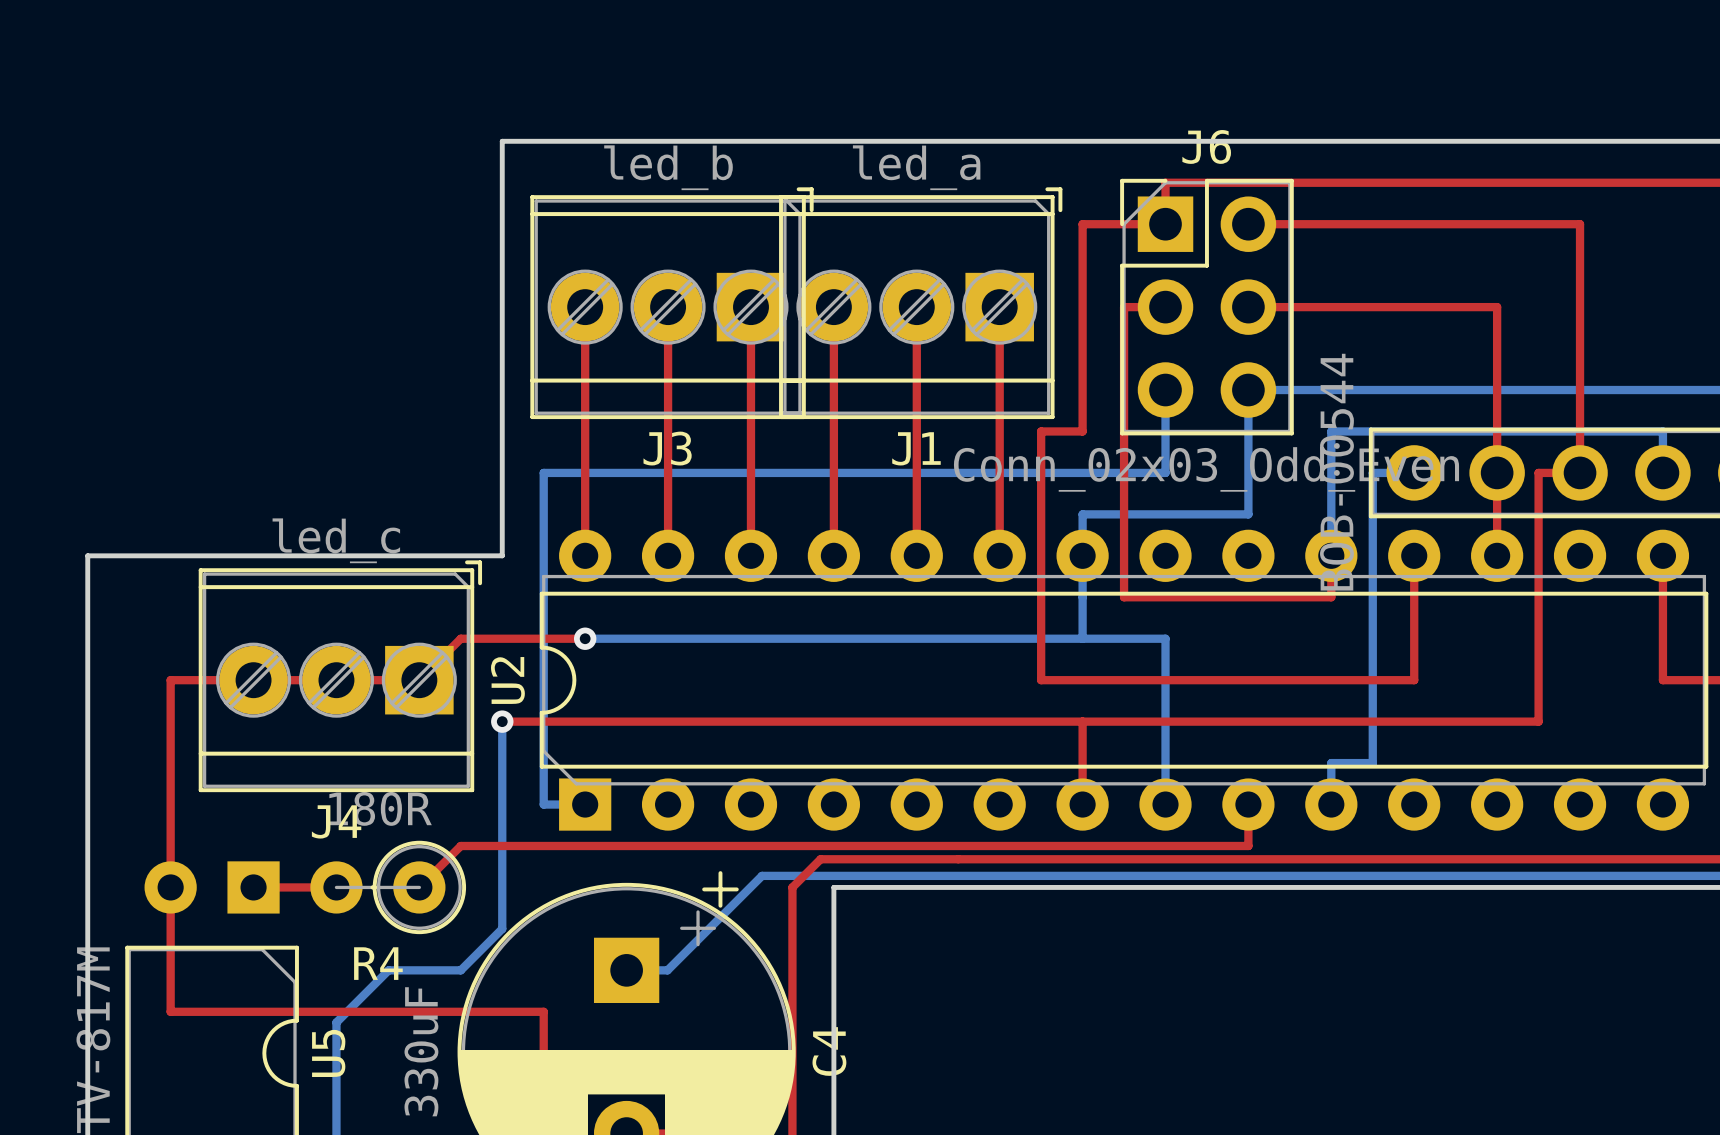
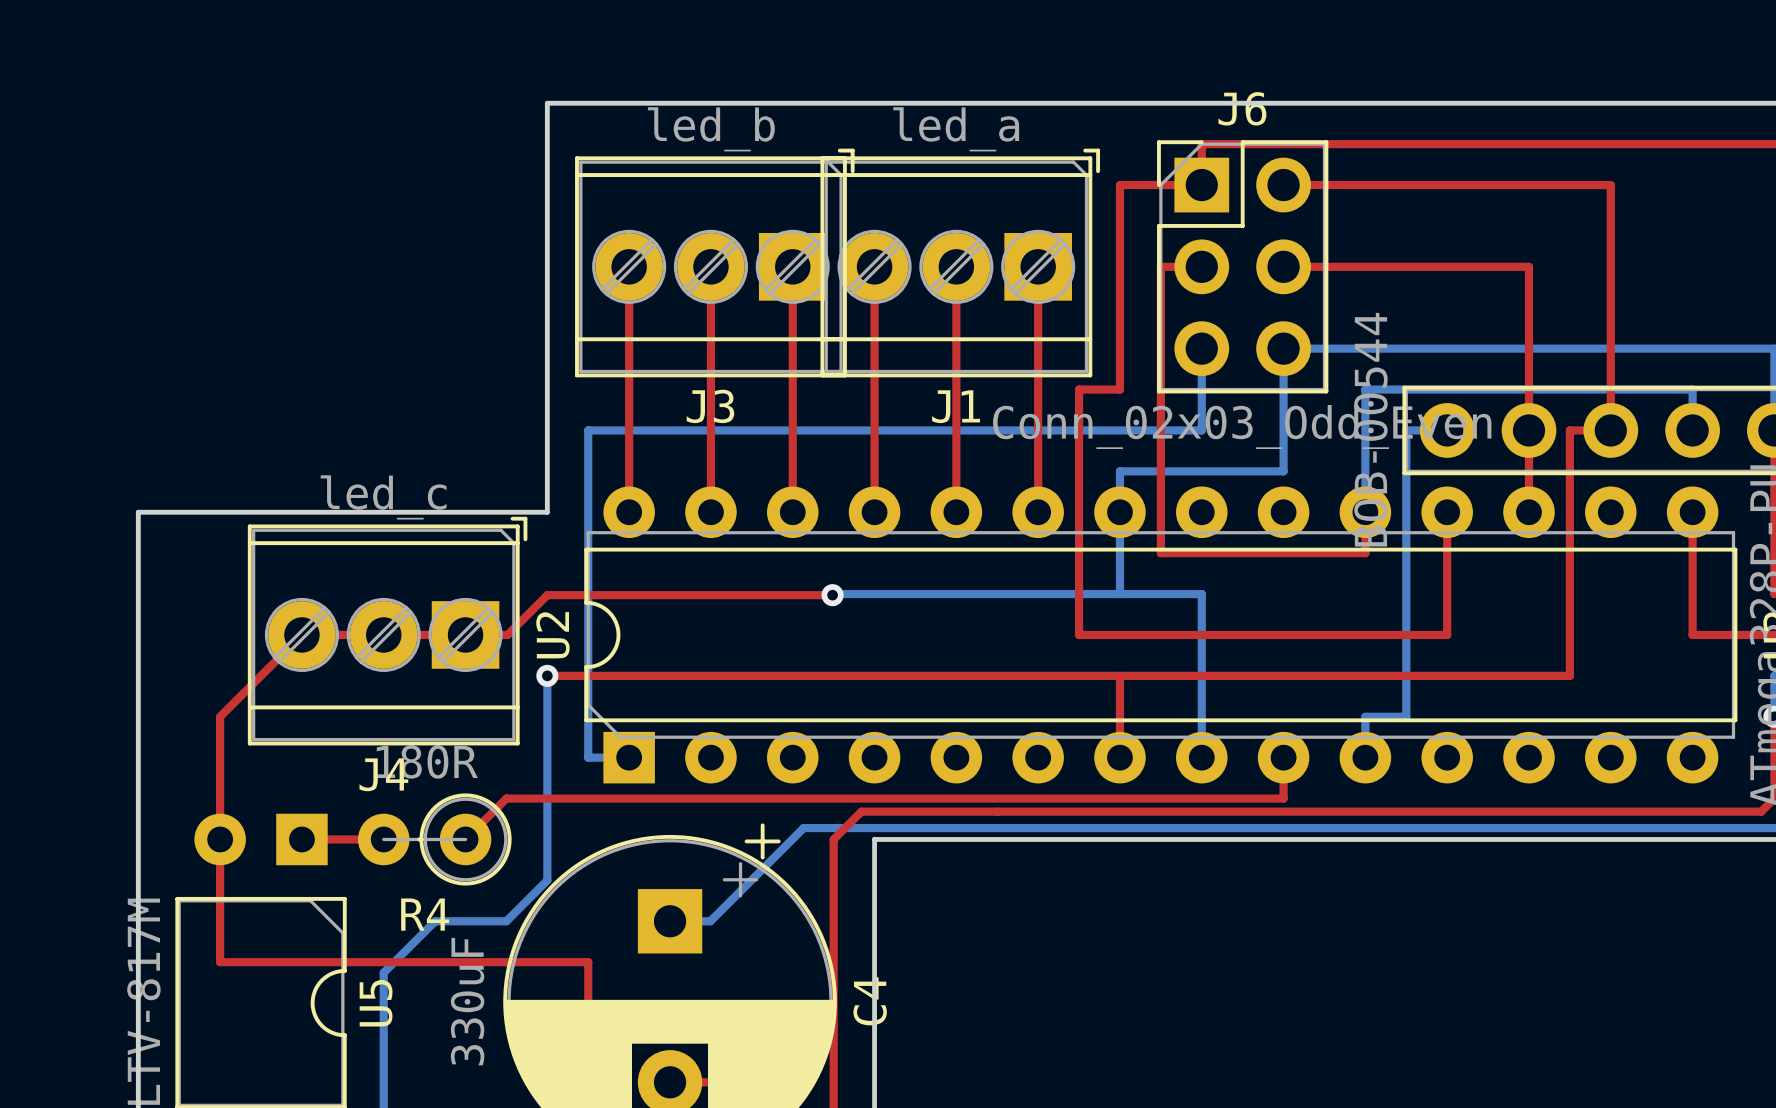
top track: (585, 638) (460, 638) (419, 680) -> (832, 595) (547, 595) (507, 634) (465, 634)
bottom track: (585, 638) (792, 638) -> none
via: (585, 638) -> none
via: none -> (832, 595)
top track: (253, 680) (170, 680) (170, 763) -> (301, 634) (220, 716)

